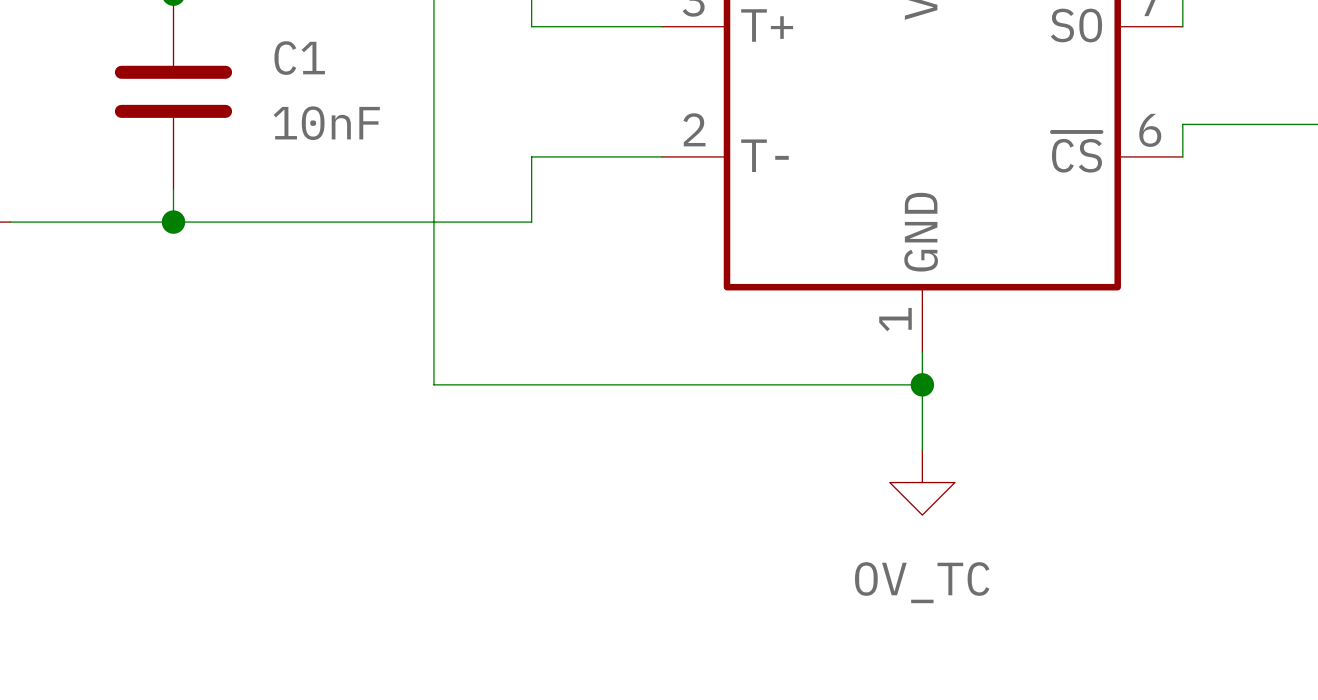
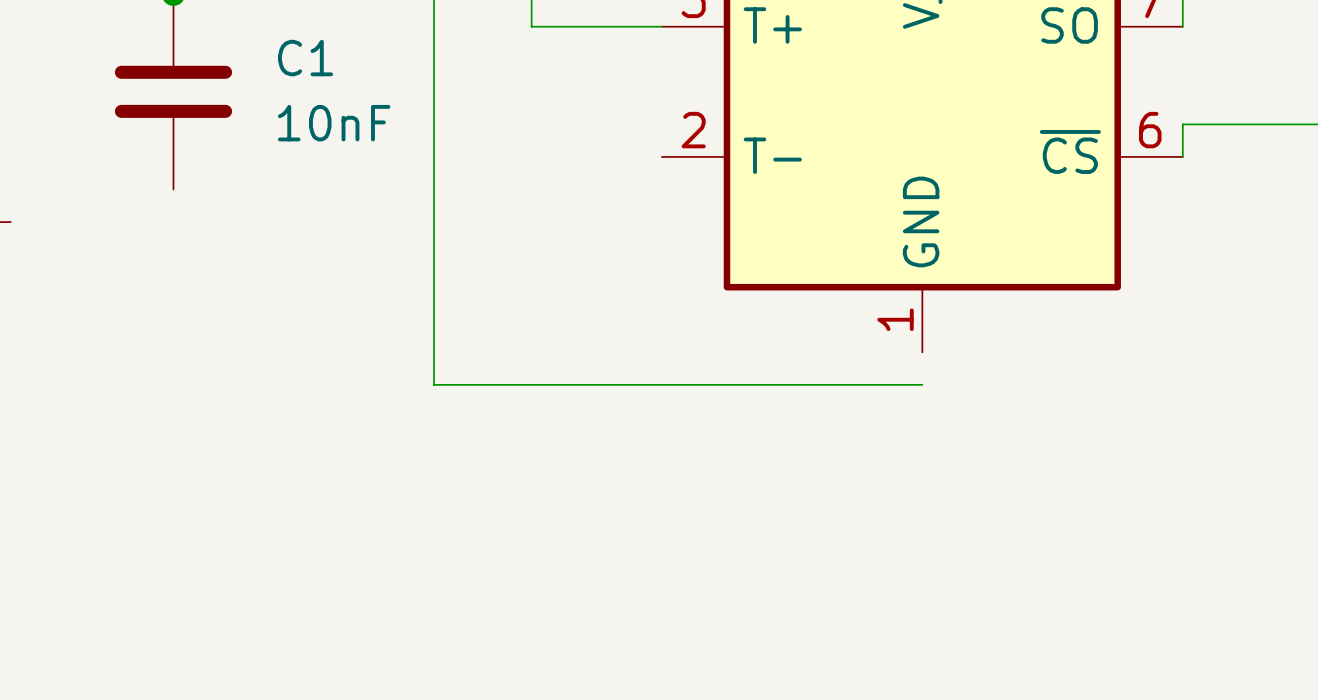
wire: (661, 156) (531, 156) (531, 222) (10, 222) -> none
wire: (173, 189) (173, 222) -> none
junction: (173, 222) -> none
wire: (922, 352) (922, 449) -> none
junction: (922, 384) -> none
power symbol: OV_TC (922, 482) -> none

